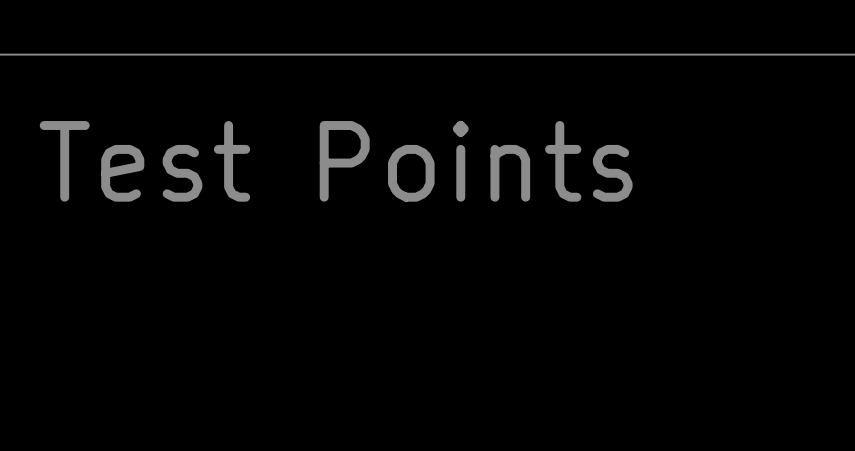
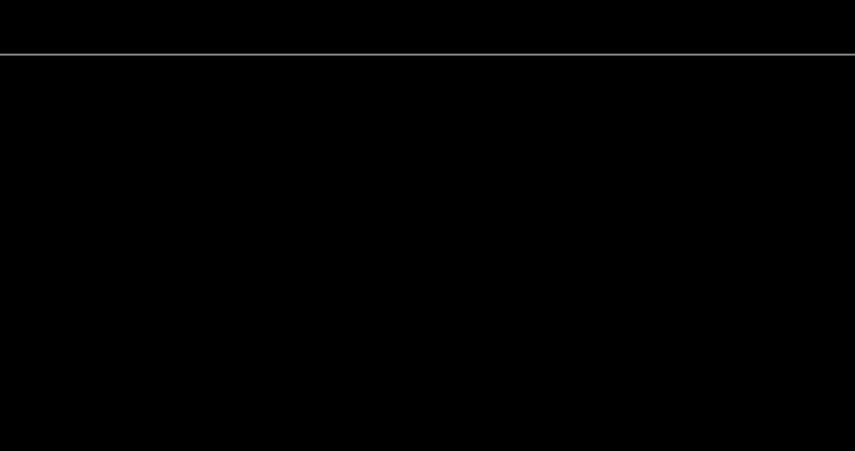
text: Test Points (336, 161) -> none

